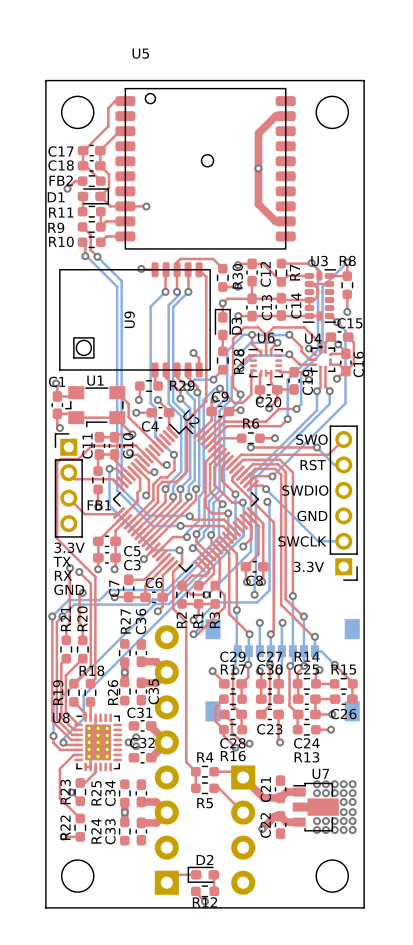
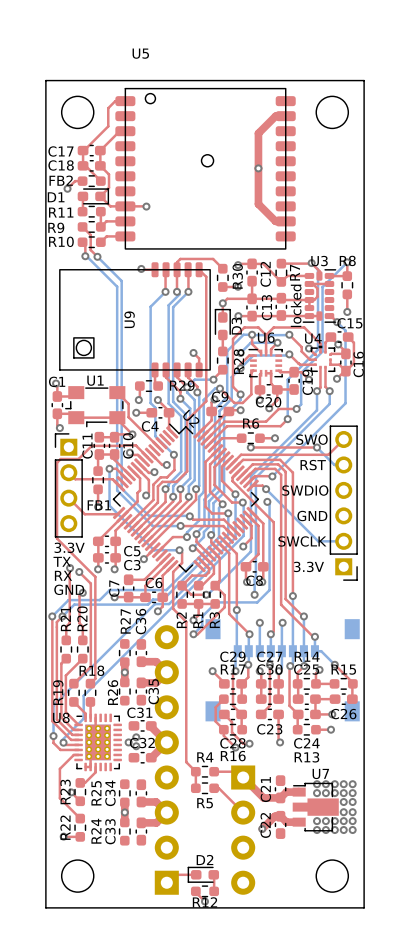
C14 name: C14 (296, 305) -> locked (296, 305)

